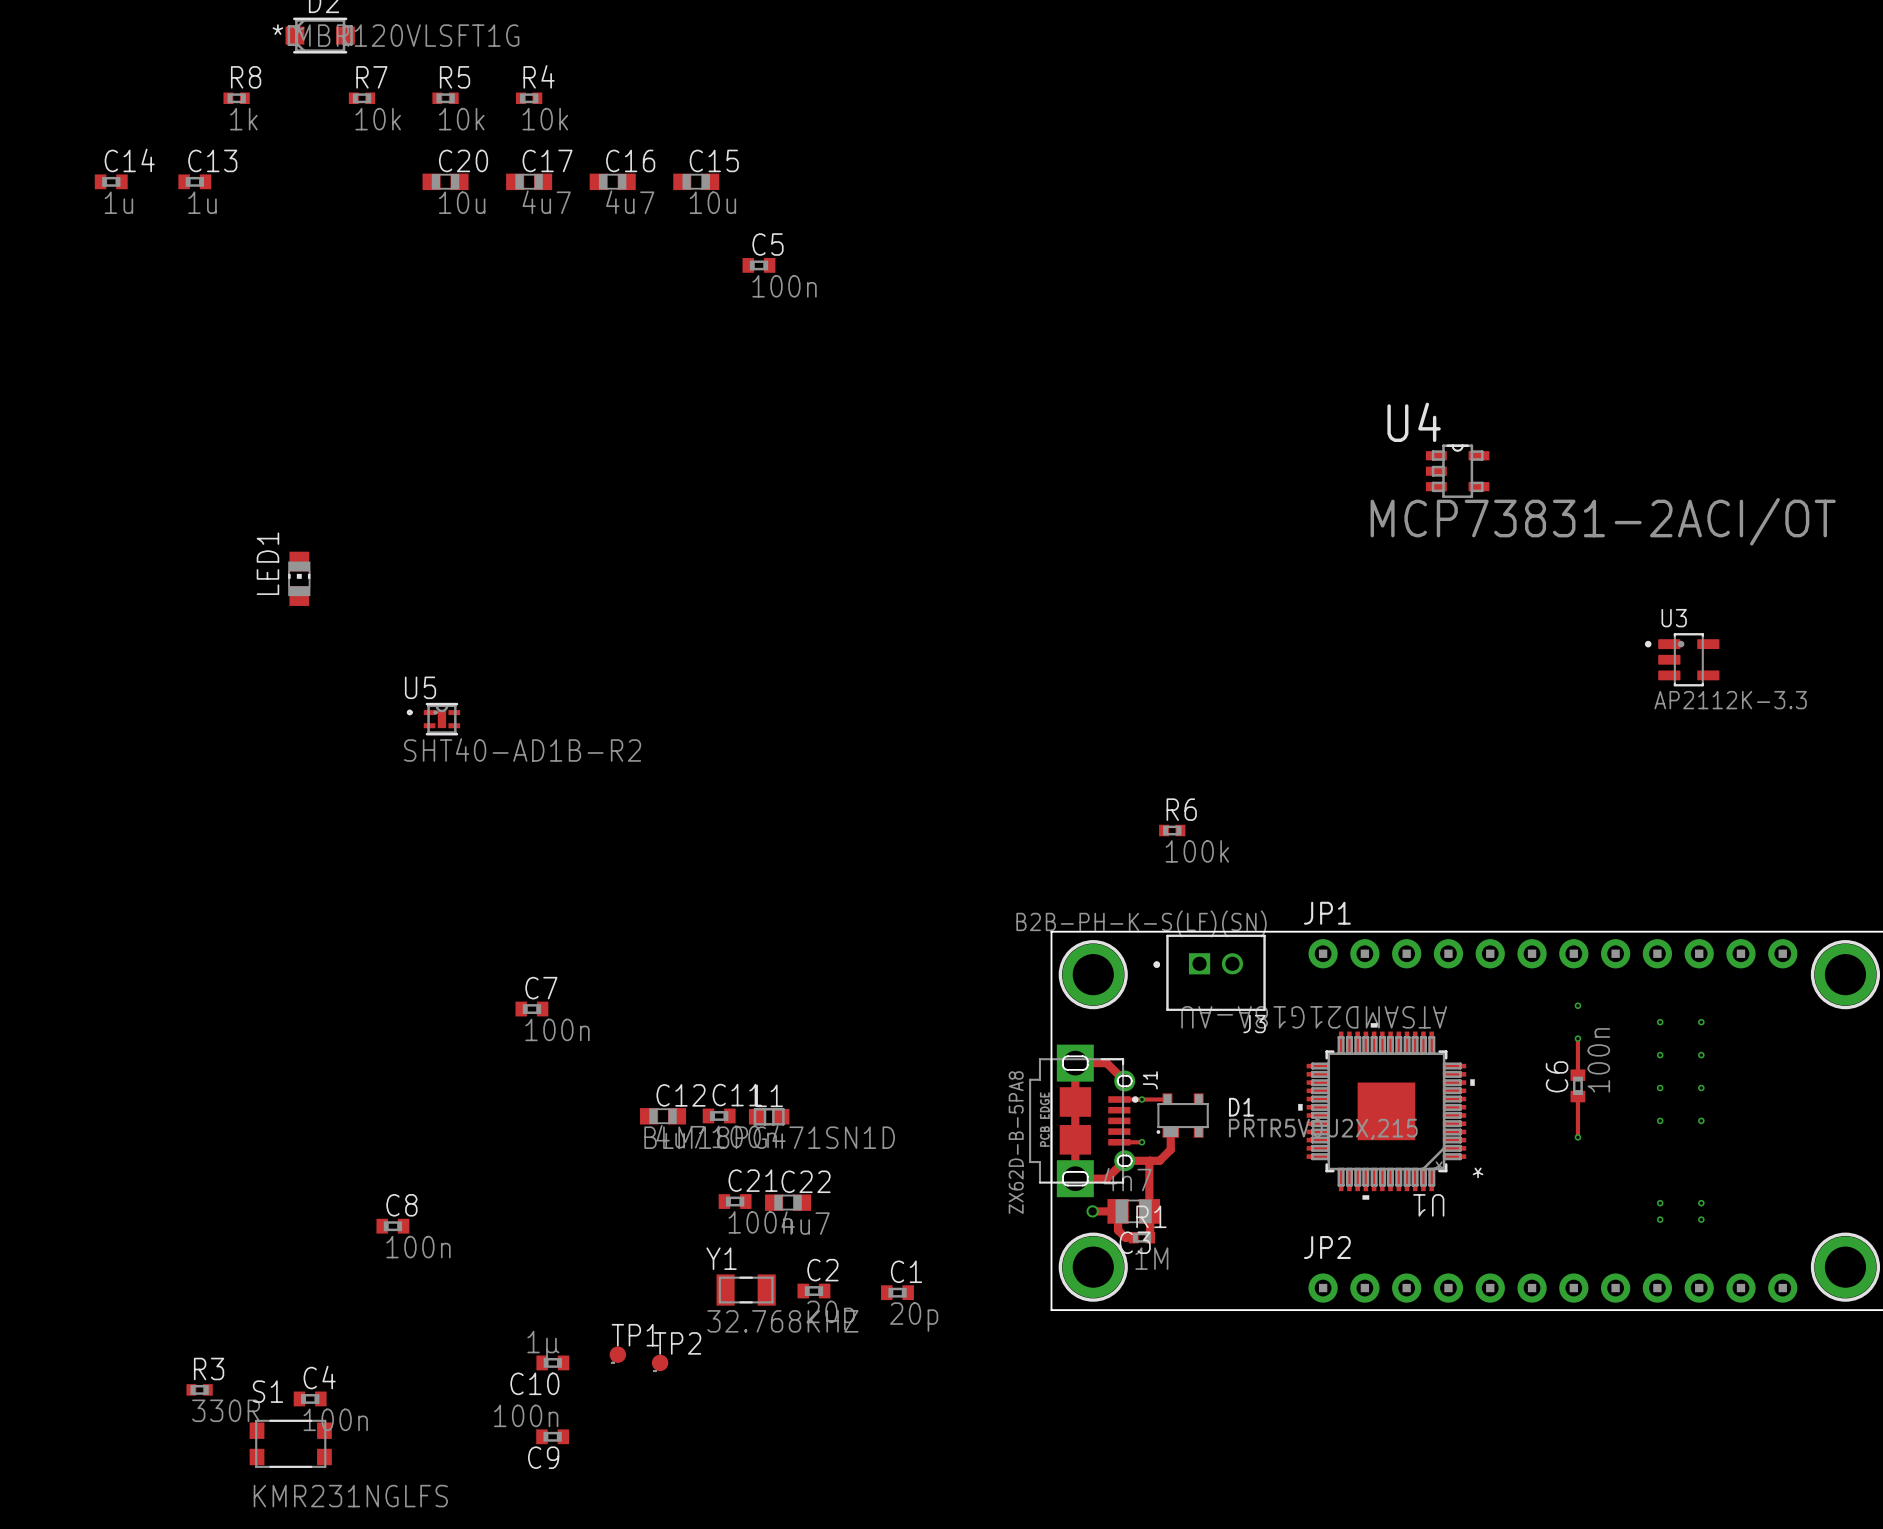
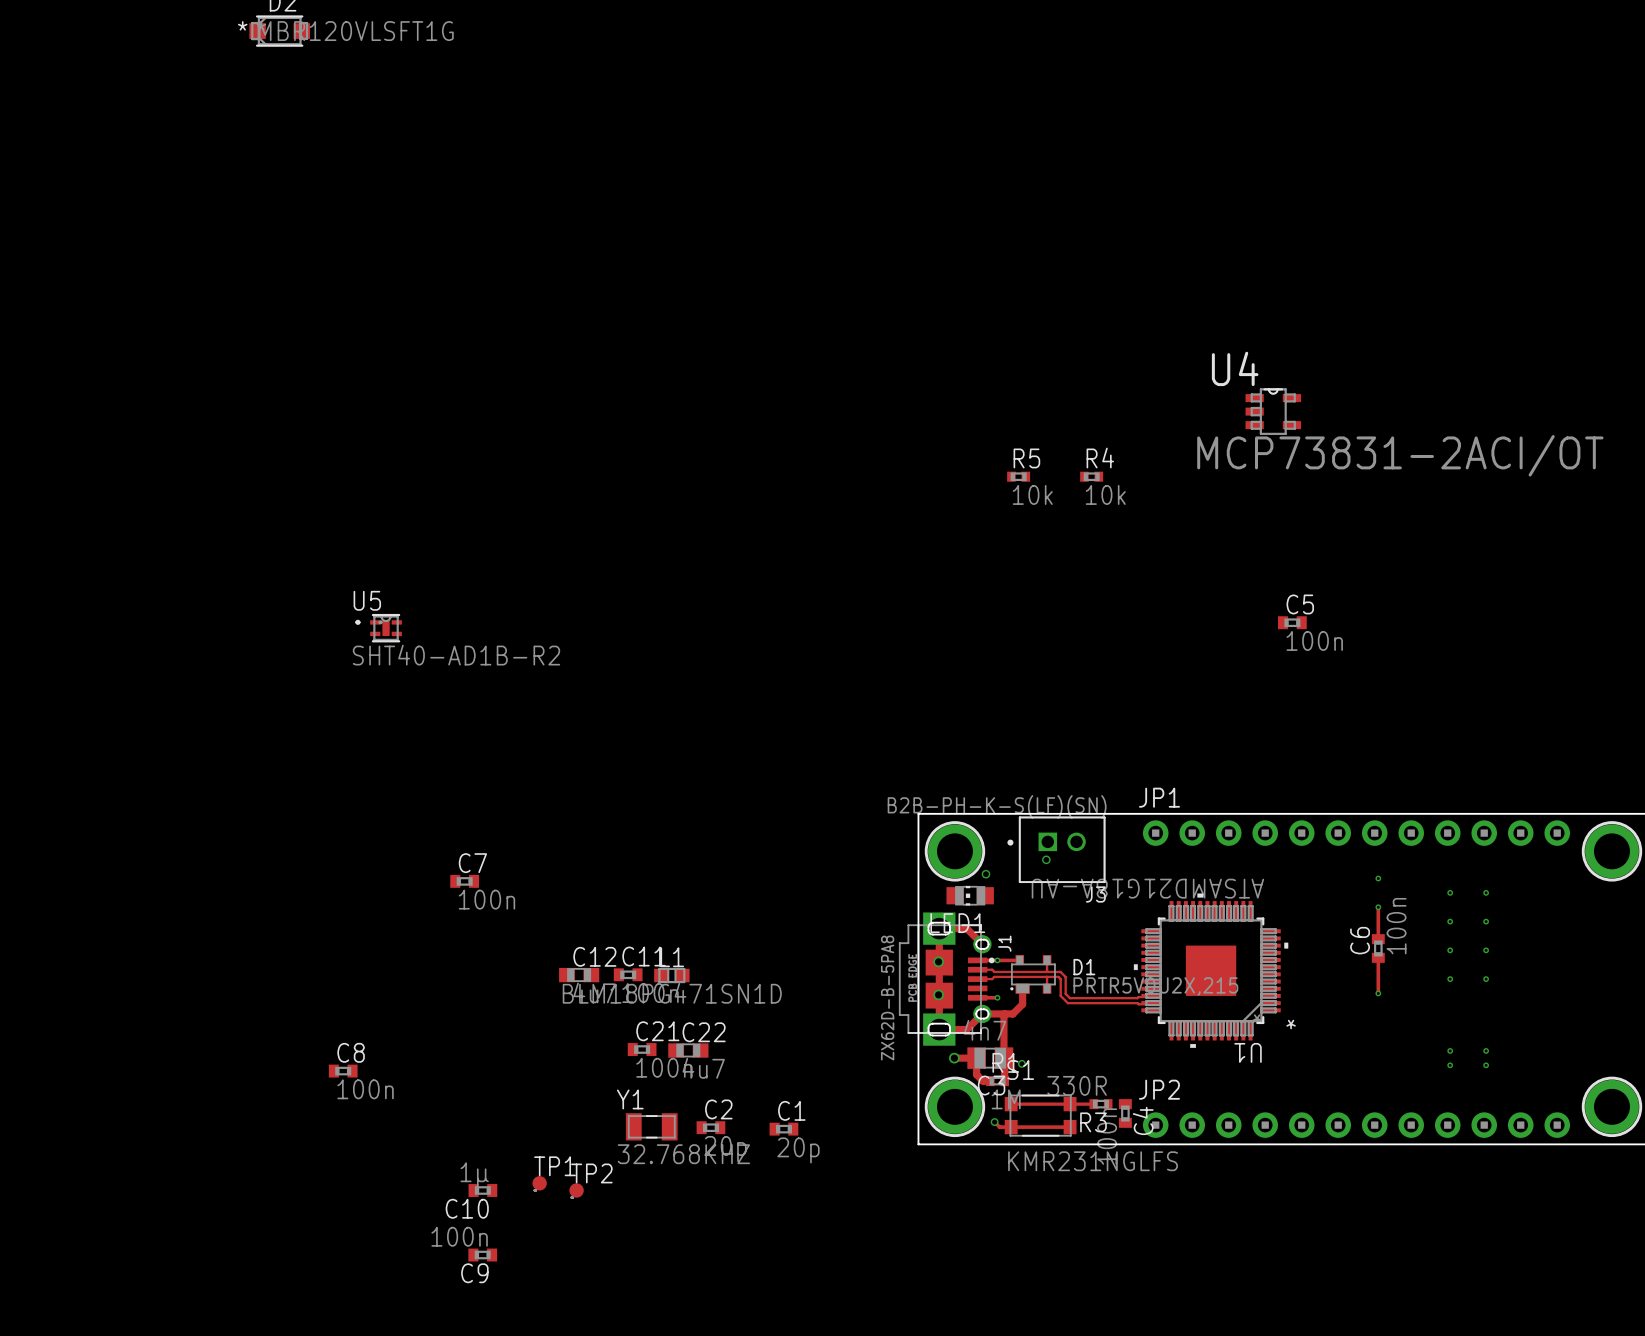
R8: 1k (236, 98) -> none
R7: 10k (361, 98) -> none
R5 position: (445, 98) -> (1018, 476)
R4 position: (529, 98) -> (1091, 476)
C14: 1u (111, 181) -> none
C13: 1u (194, 181) -> none
C20: 10u (445, 181) -> none
C17: 4u7 (529, 181) -> none
C16: 4u7 (612, 181) -> none
C15: 10u (696, 181) -> none
C5 position: (758, 265) -> (1292, 622)
LED1 rotation: 0° (299, 578) -> 90° counterclockwise (970, 895)
LED1 position: (299, 578) -> (970, 895)
U3: AP2112K-3.3 (1682, 659) -> none
R6: 100k (1172, 830) -> none
via: none -> (1046, 859)
via: none -> (986, 874)
track: none -> (1047, 960) (1046, 971)
via: none -> (938, 961)
track: none -> (977, 969) (992, 969) (994, 971) (1060, 971) (1065, 977) (1065, 993) (1069, 998) (1153, 997)
track: none -> (1046, 976) (1047, 988)
track: none -> (977, 979) (992, 979) (994, 976) (1058, 976) (1060, 979) (1060, 995) (1067, 1003) (1153, 1004)
via: none -> (938, 994)
via: none -> (1021, 1063)
track: none -> (1011, 1104) (1093, 1104)
track: none -> (994, 1122) (999, 1127) (1070, 1127)
via: none -> (994, 1122)
R3 name position: R3 (209, 1369) -> R3 (1093, 1122)
R3 position: (199, 1389) -> (1100, 1104)
C4 rotation: 0° (310, 1398) -> 90° clockwise (1125, 1113)
C4 position: (310, 1398) -> (1125, 1113)
R3 value position: 330R (226, 1410) -> 330R (1077, 1085)
S1 position: (290, 1443) -> (1040, 1115)

